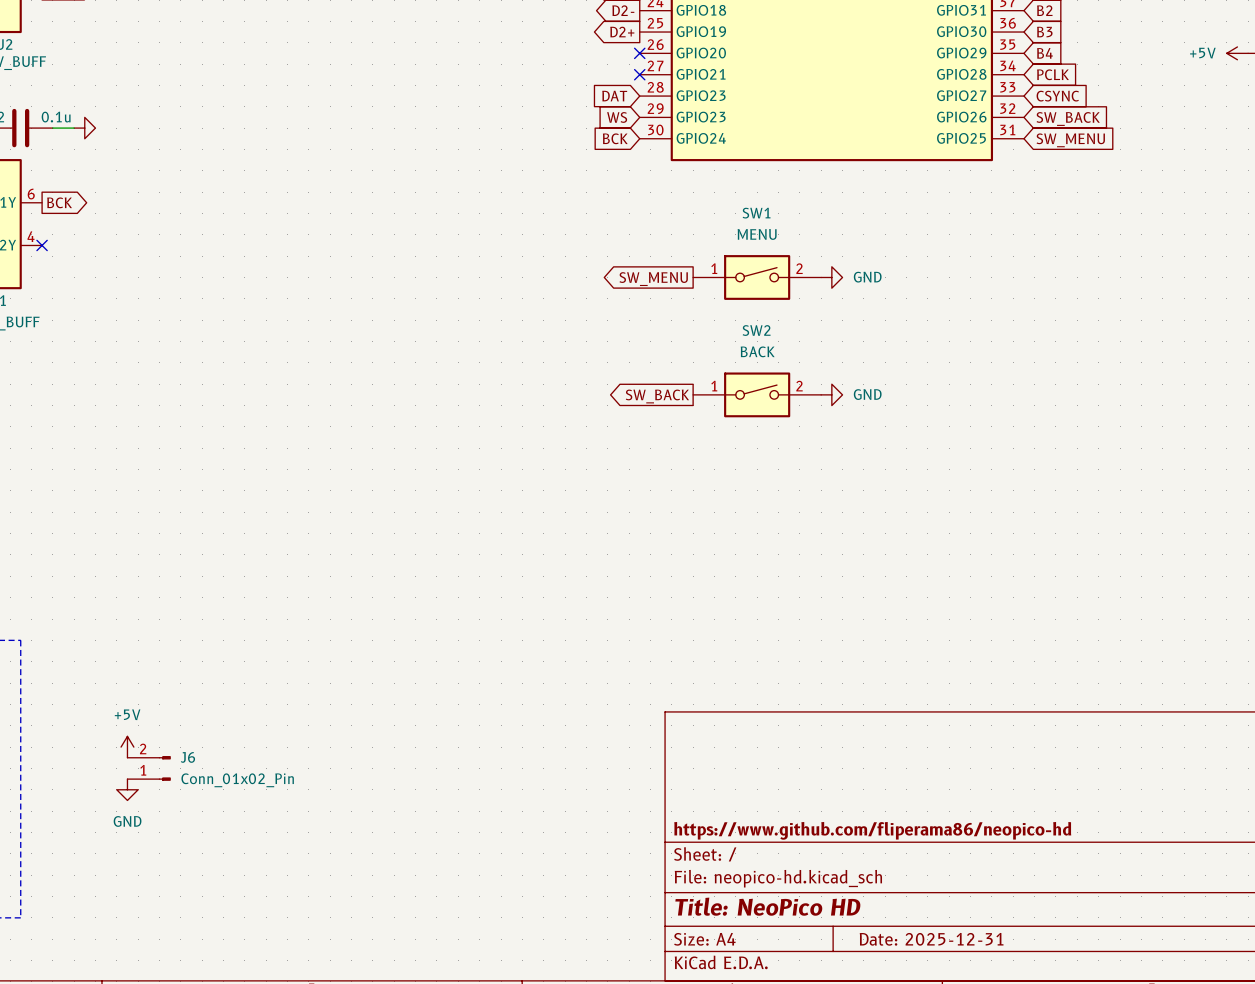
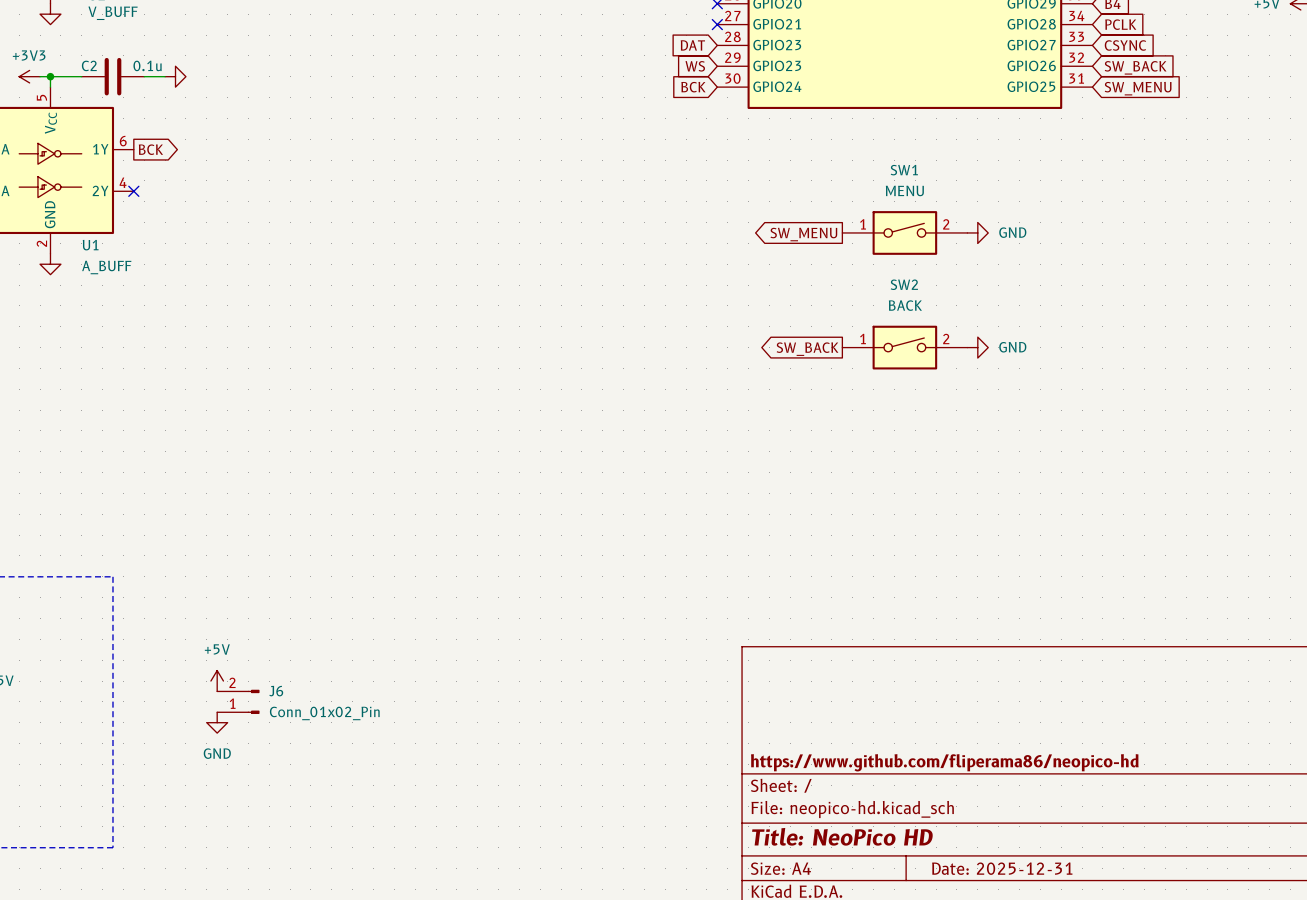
SW1 position: (757, 277) -> (904, 232)
power symbol: GND (831, 277) -> none
global label position: SW_MENU (653, 279) -> SW_MENU (803, 234)
power symbol: none -> GND (977, 232)
SW2 position: (757, 394) -> (904, 347)
power symbol: GND (831, 394) -> none
global label position: SW_BACK (657, 396) -> SW_BACK (807, 349)
power symbol: none -> GND (977, 347)

